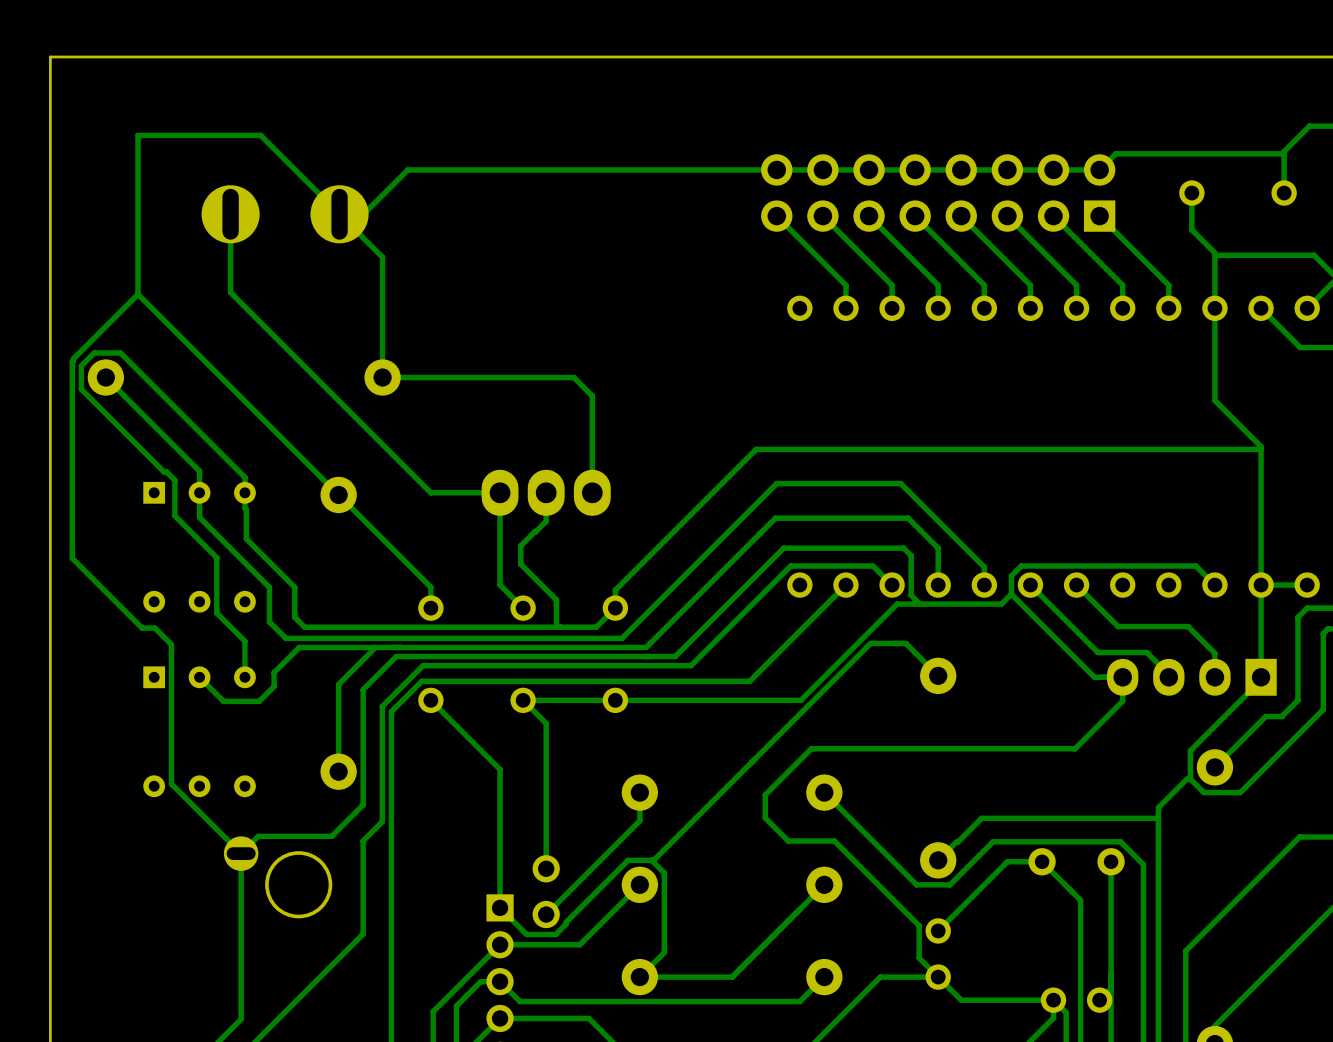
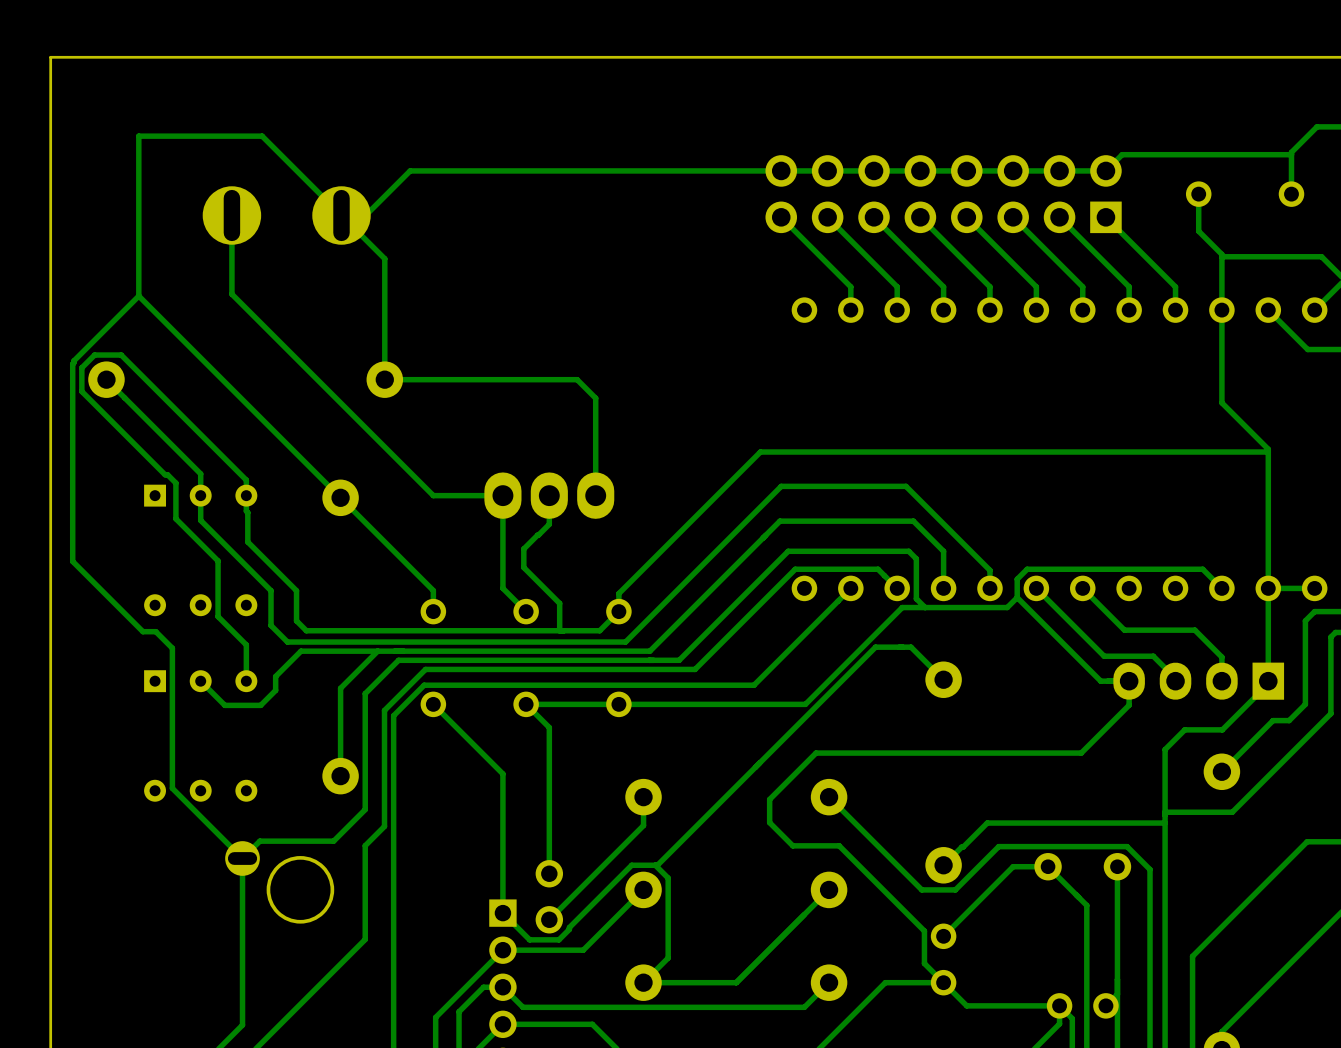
bottom track: (1215, 725) (1190, 750) (1190, 779) -> (1222, 729) (1184, 729) (1165, 749) (1165, 812) (1232, 812) (1247, 797)
bottom track: (1190, 779) (1203, 792) (1240, 792) -> none
bottom track: (1190, 779) (1186, 779) (1158, 807) -> none

